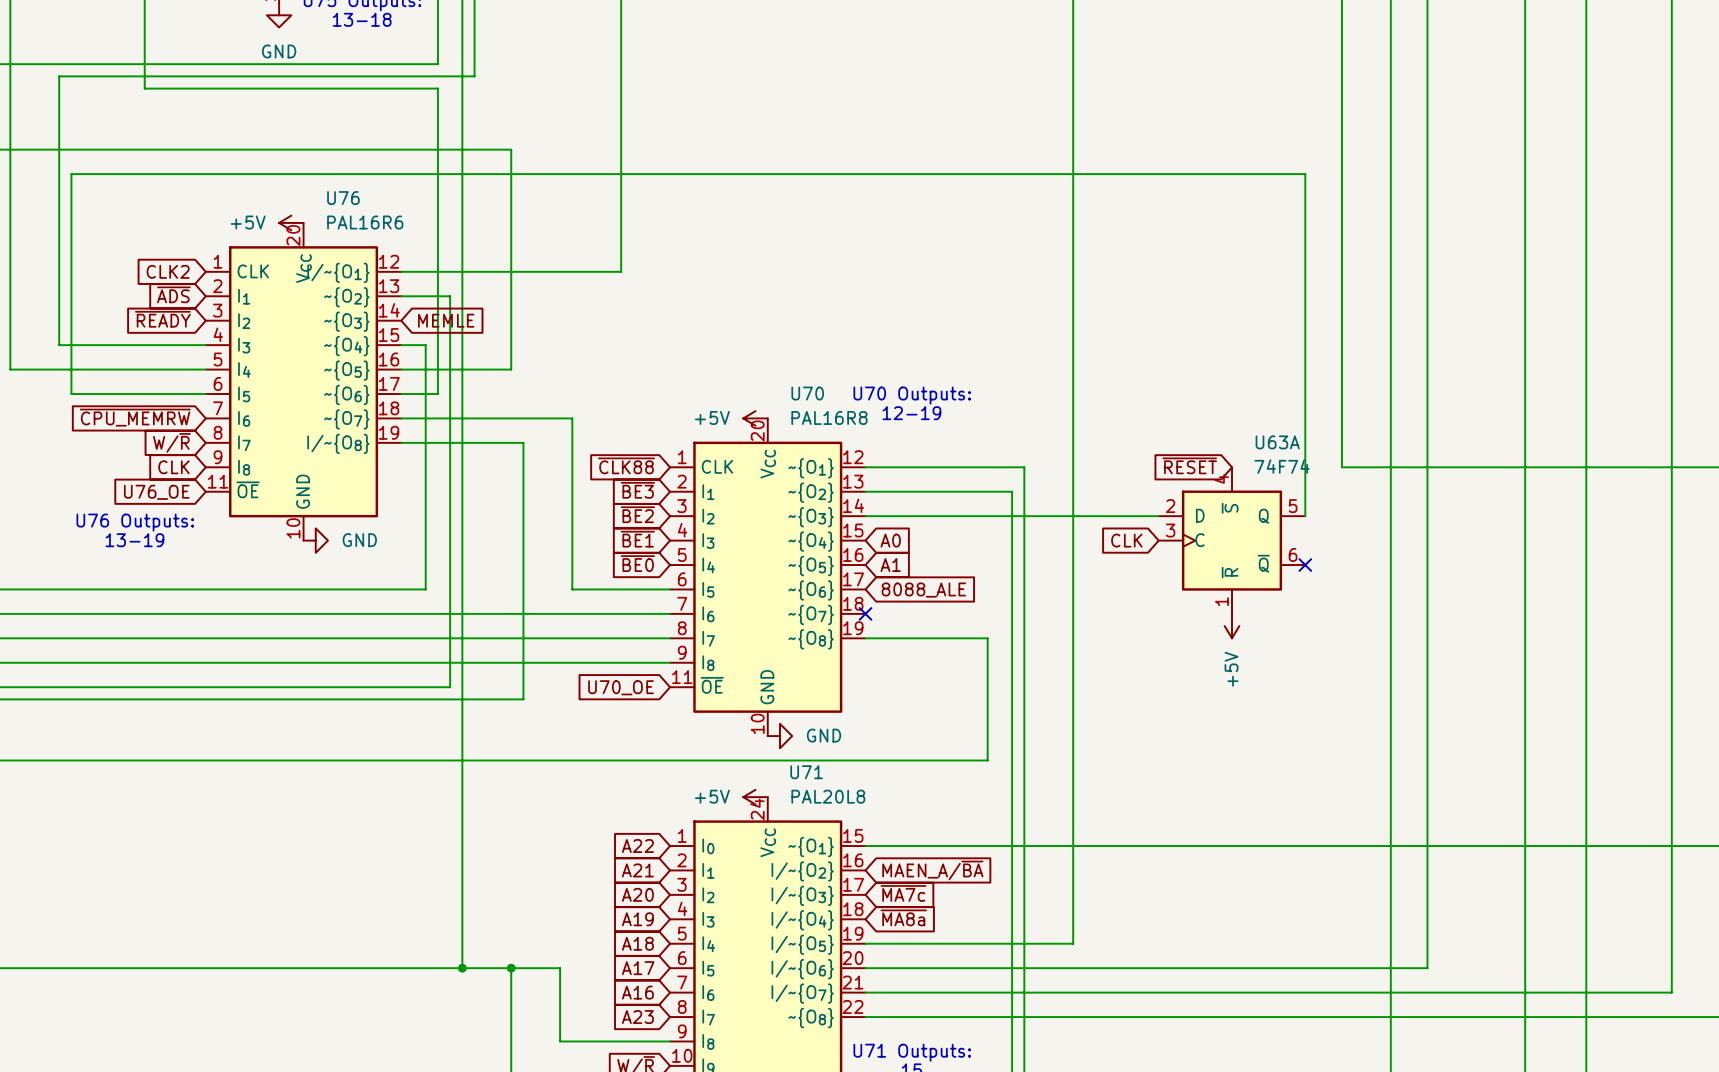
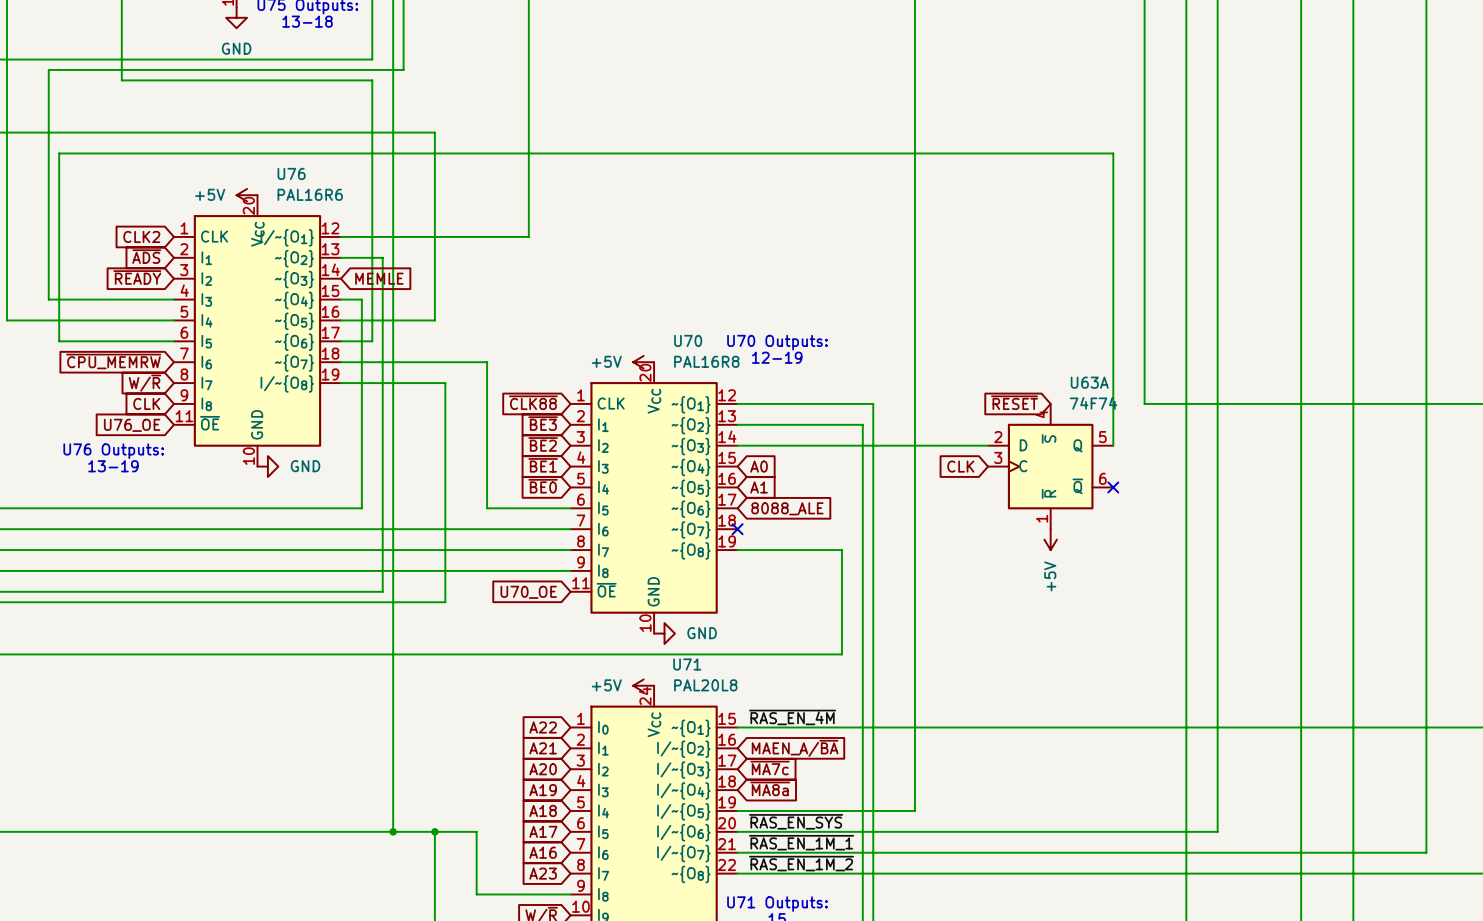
label: none -> ~{RAS_EN_4M} (792, 717)
label: none -> ~{RAS_EN_SYS} (796, 821)
label: none -> ~{RAS_EN_1M_1} (801, 842)
label: none -> ~{RAS_EN_1M_2} (801, 863)

